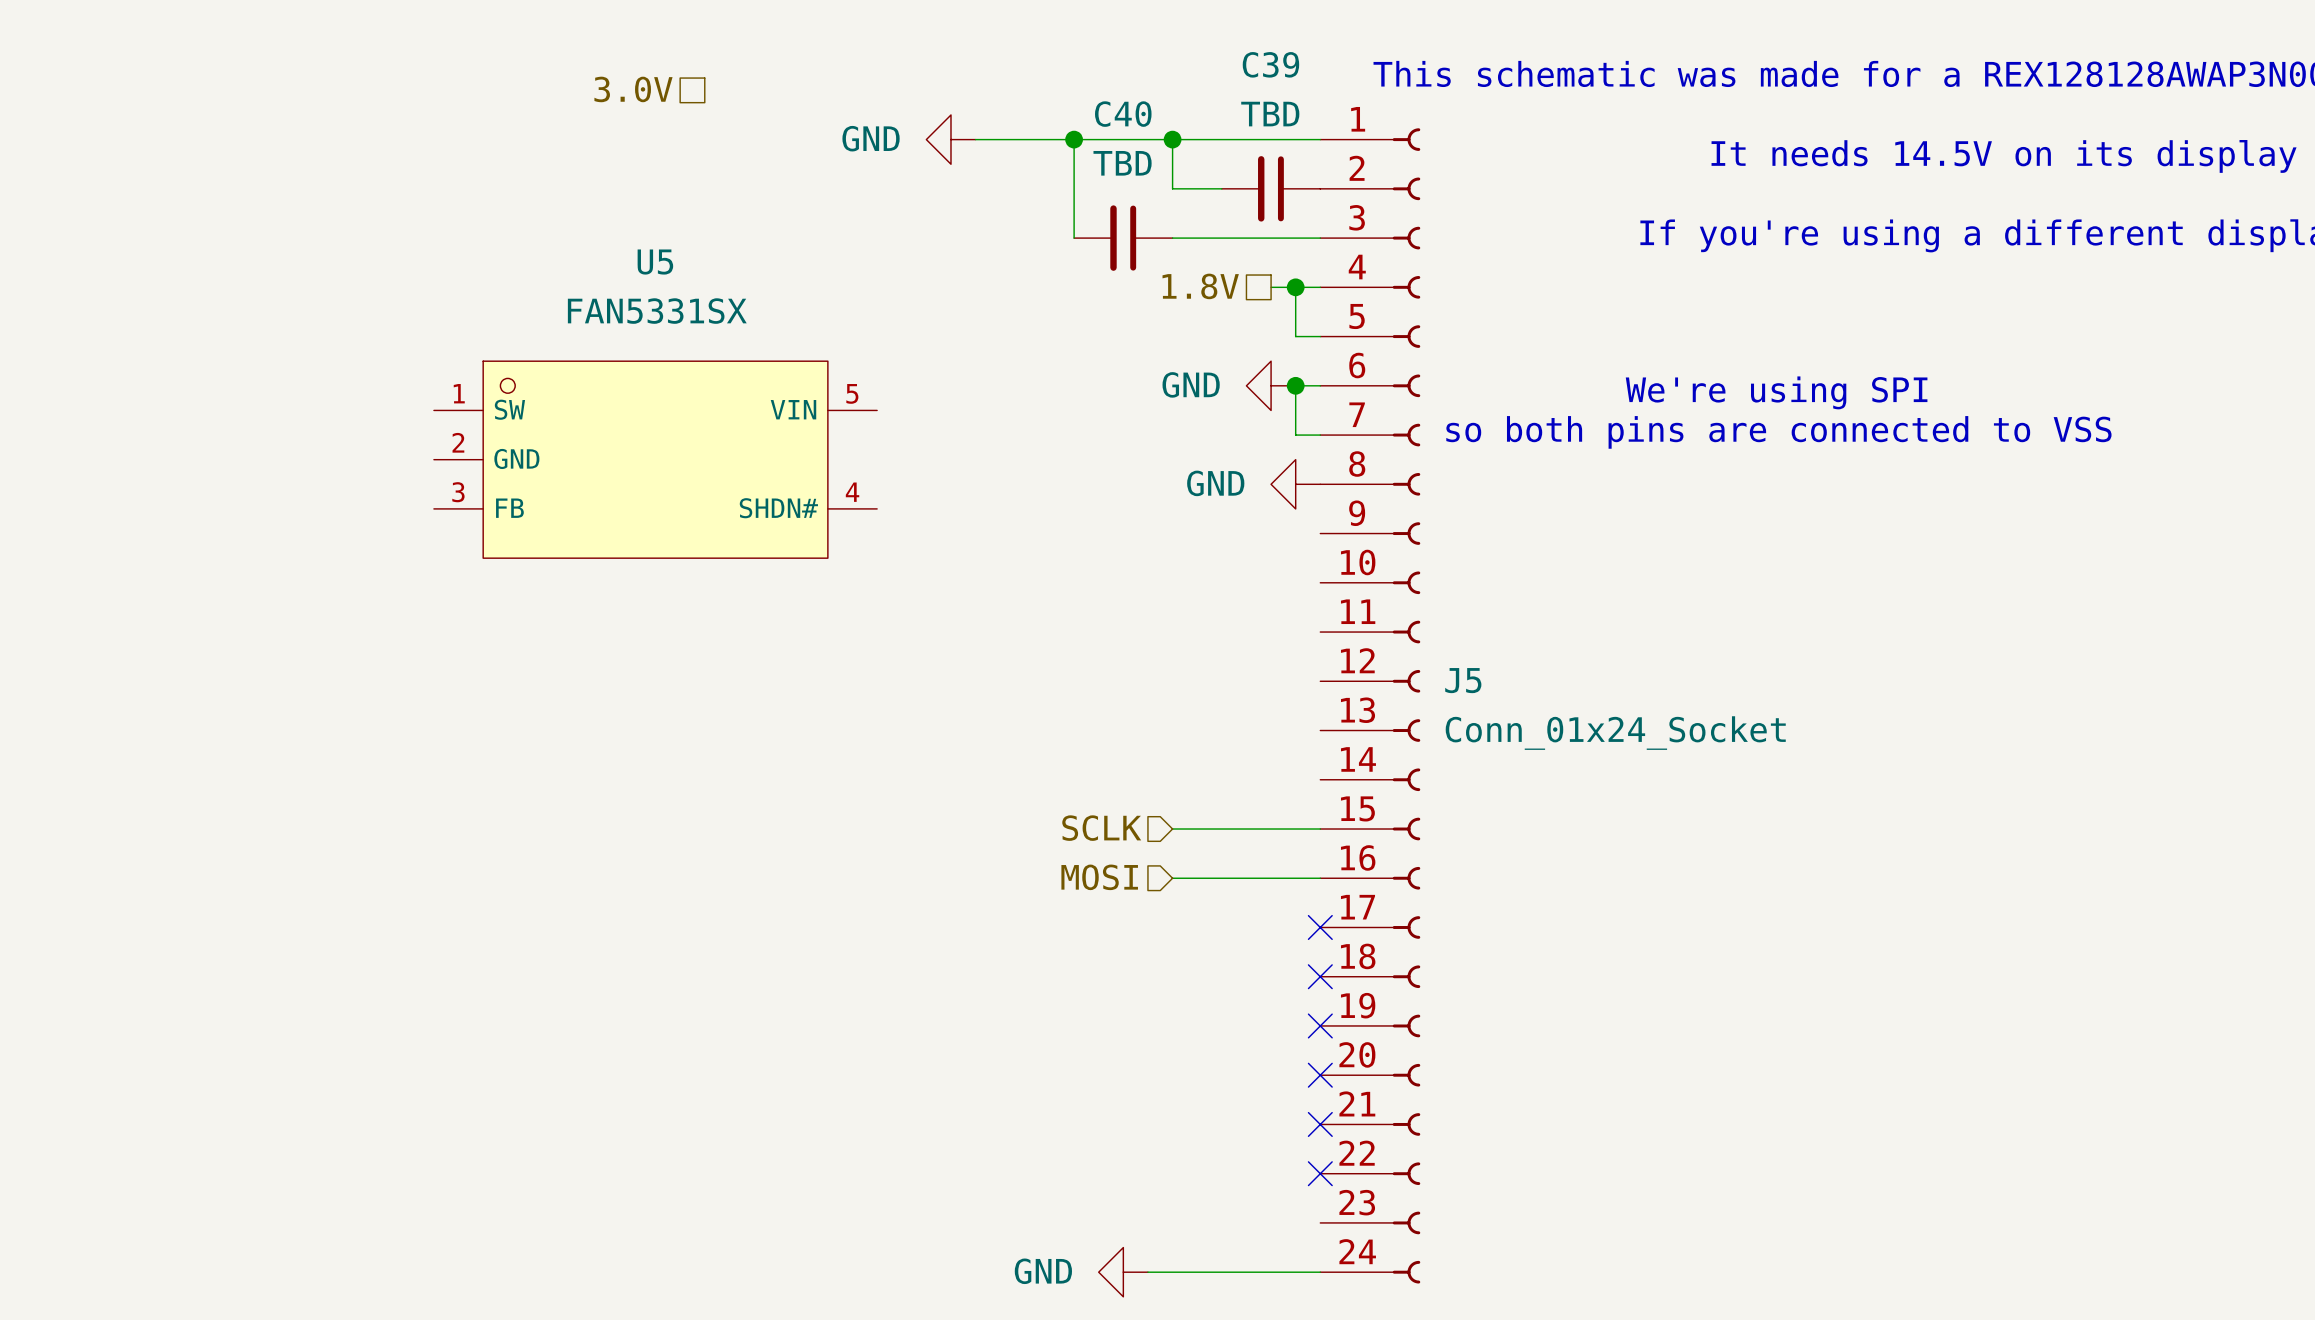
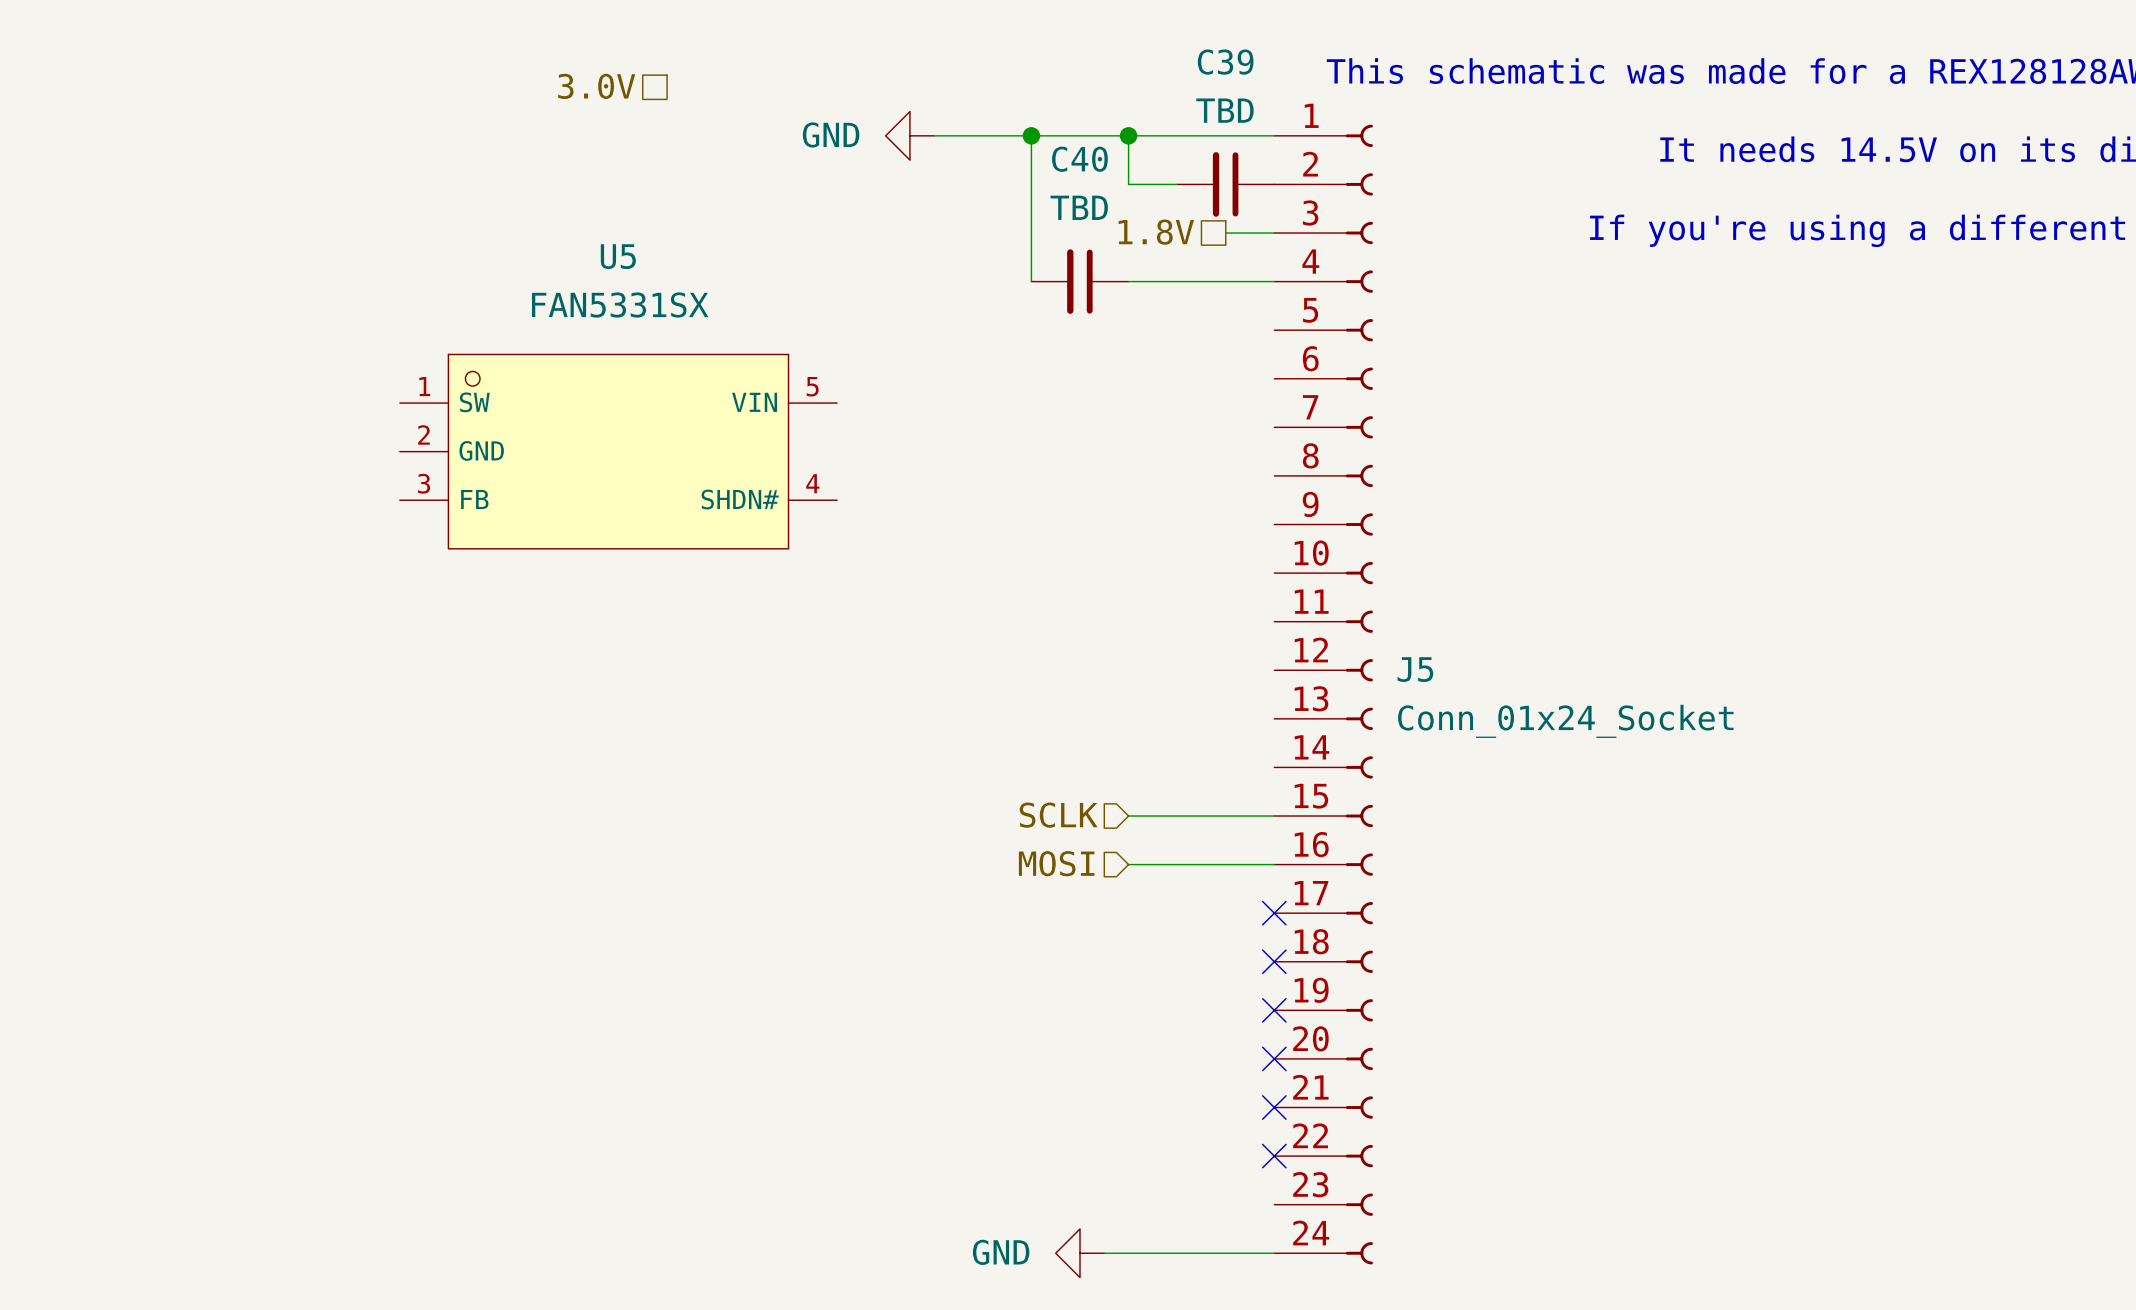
wire: none -> (1031, 233) (1031, 281)
C40 position: (1123, 238) -> (1080, 281)
wire: (1172, 238) (1271, 238) -> (1128, 281) (1225, 281)
hierarchical label position: 1.8V (1200, 286) -> 1.8V (1156, 232)
wire: (1295, 287) (1295, 336) (1320, 336) -> none
junction: (1295, 287) -> none
power symbol: GND (1271, 385) -> none
junction: (1295, 385) -> none
wire: (1320, 385) (1295, 385) (1295, 435) (1320, 435) -> none
text: We're using SPI (1776, 392) -> none
text: so both pins are connected to VSS (1778, 432) -> none
power symbol: GND (1295, 484) -> none

